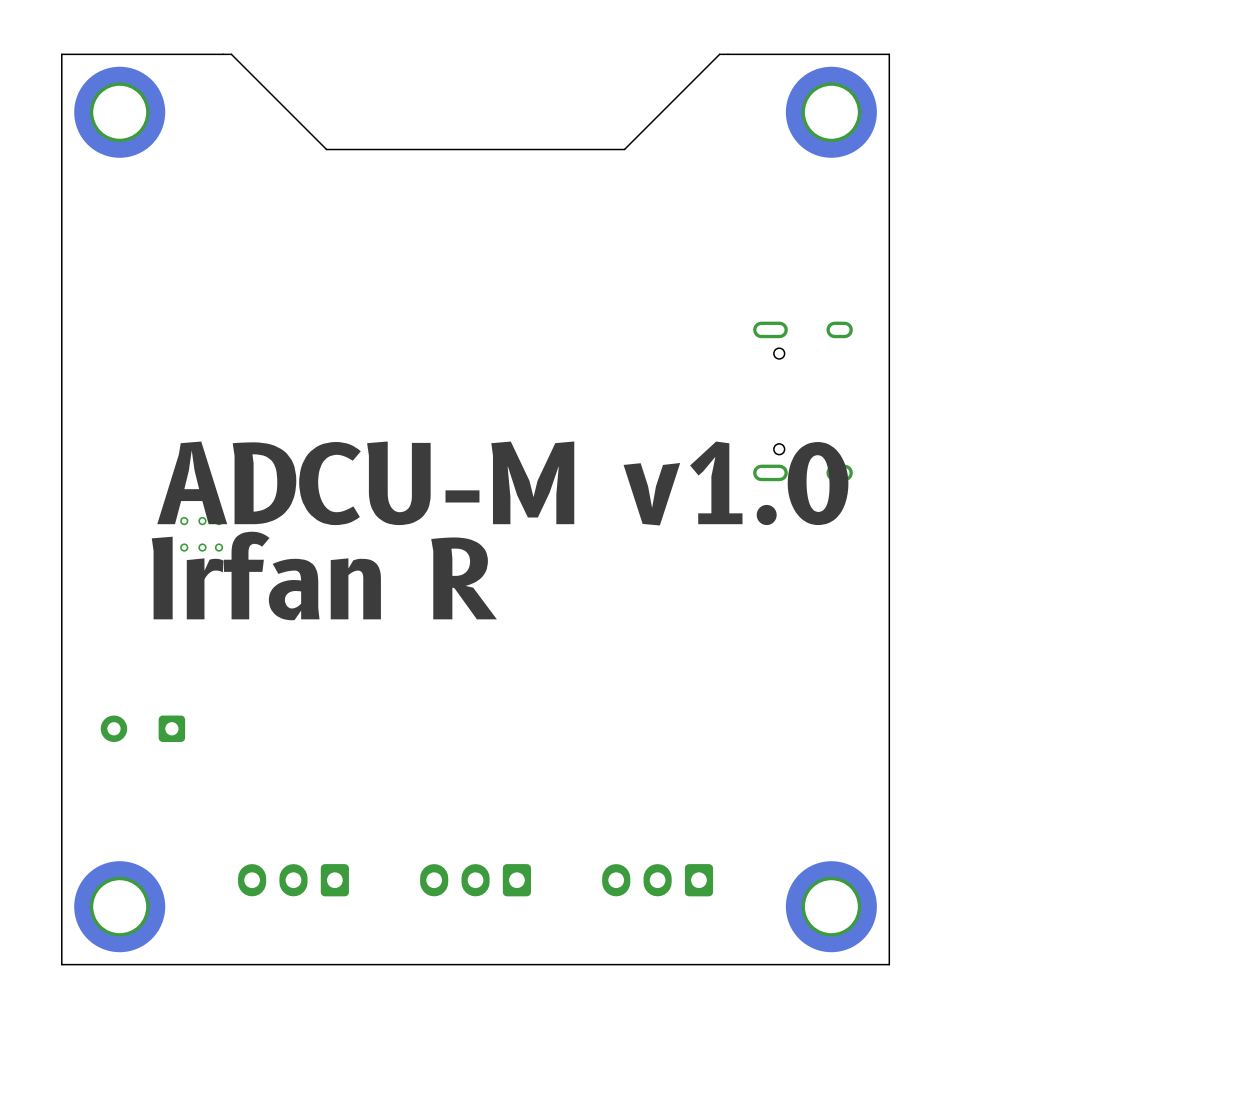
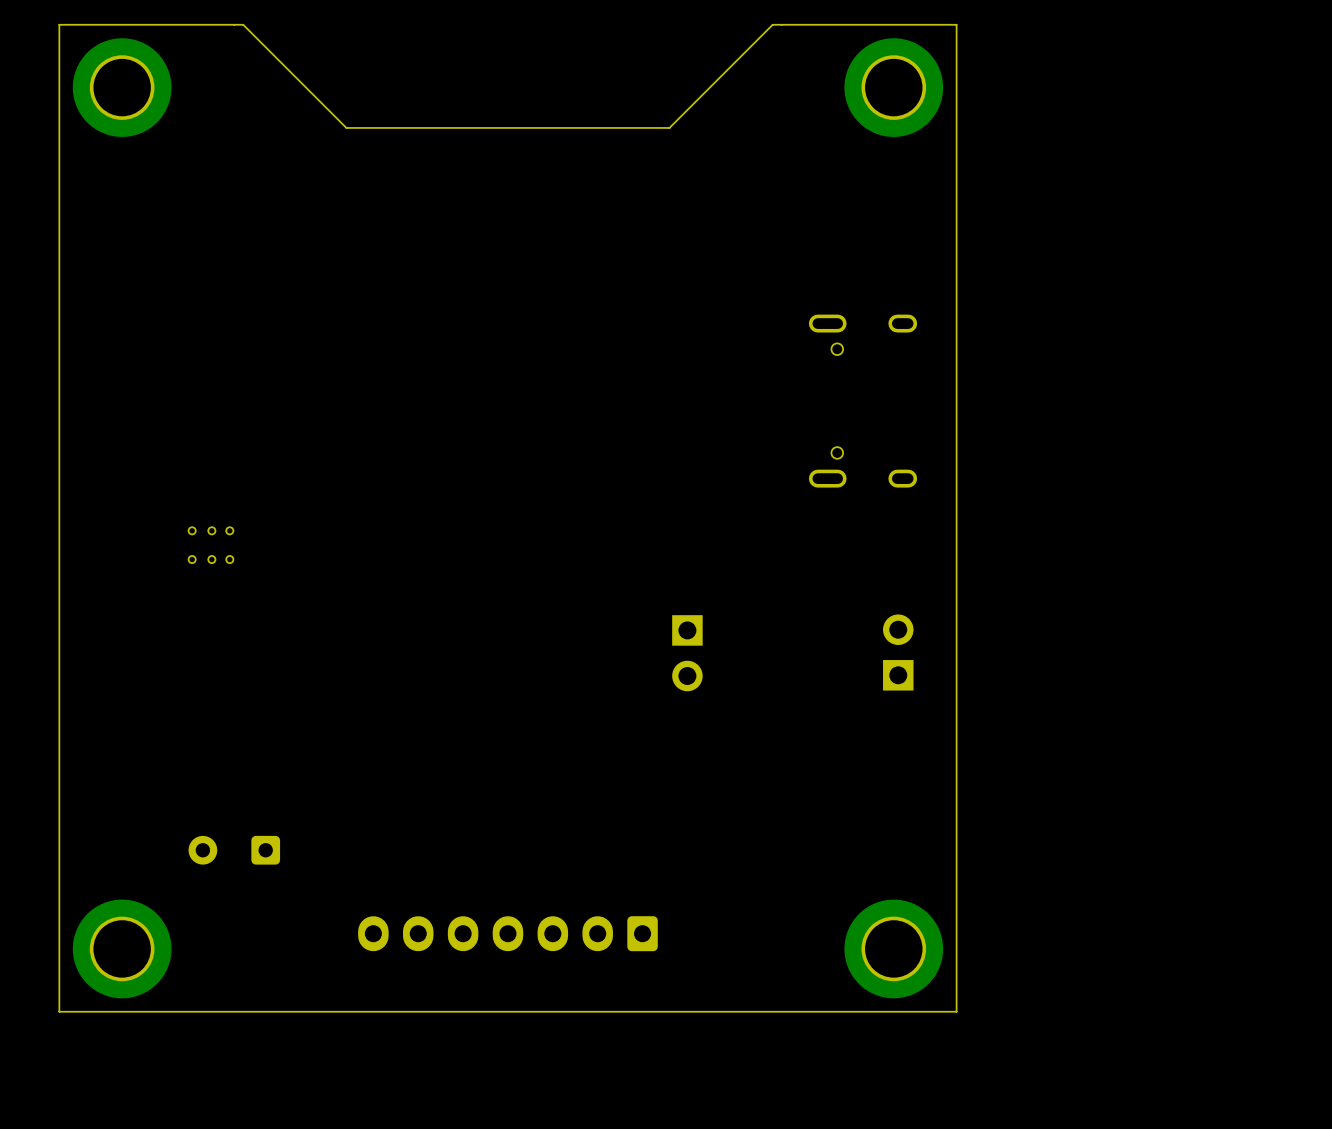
text: ADCU-M v1.0 (502, 483) -> none
text: Irfan R (324, 575) -> none
part: none -> (687, 653)
part: none -> (898, 652)
part position: (142, 728) -> (234, 850)
part footprint: [420, 864, 531, 897] -> [358, 916, 658, 952]
part: (293, 880) -> none
part: (657, 880) -> none

